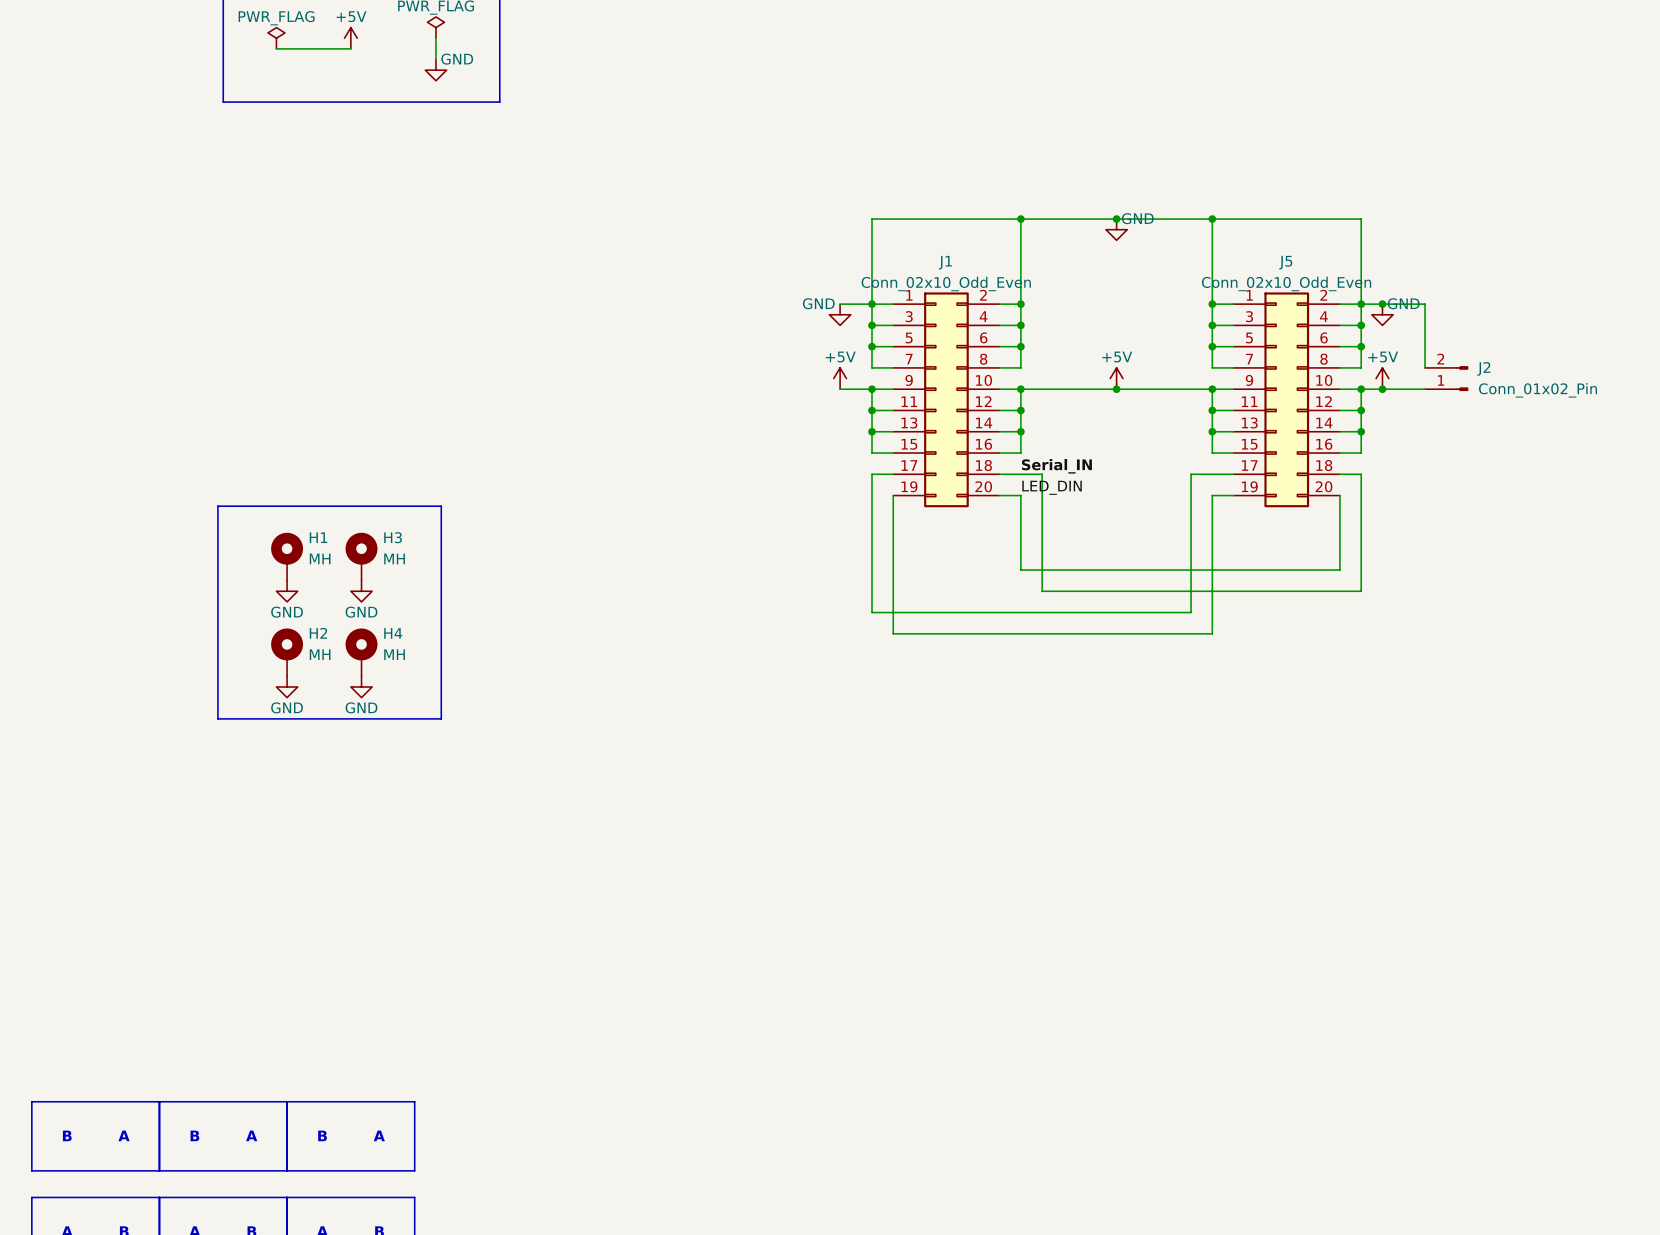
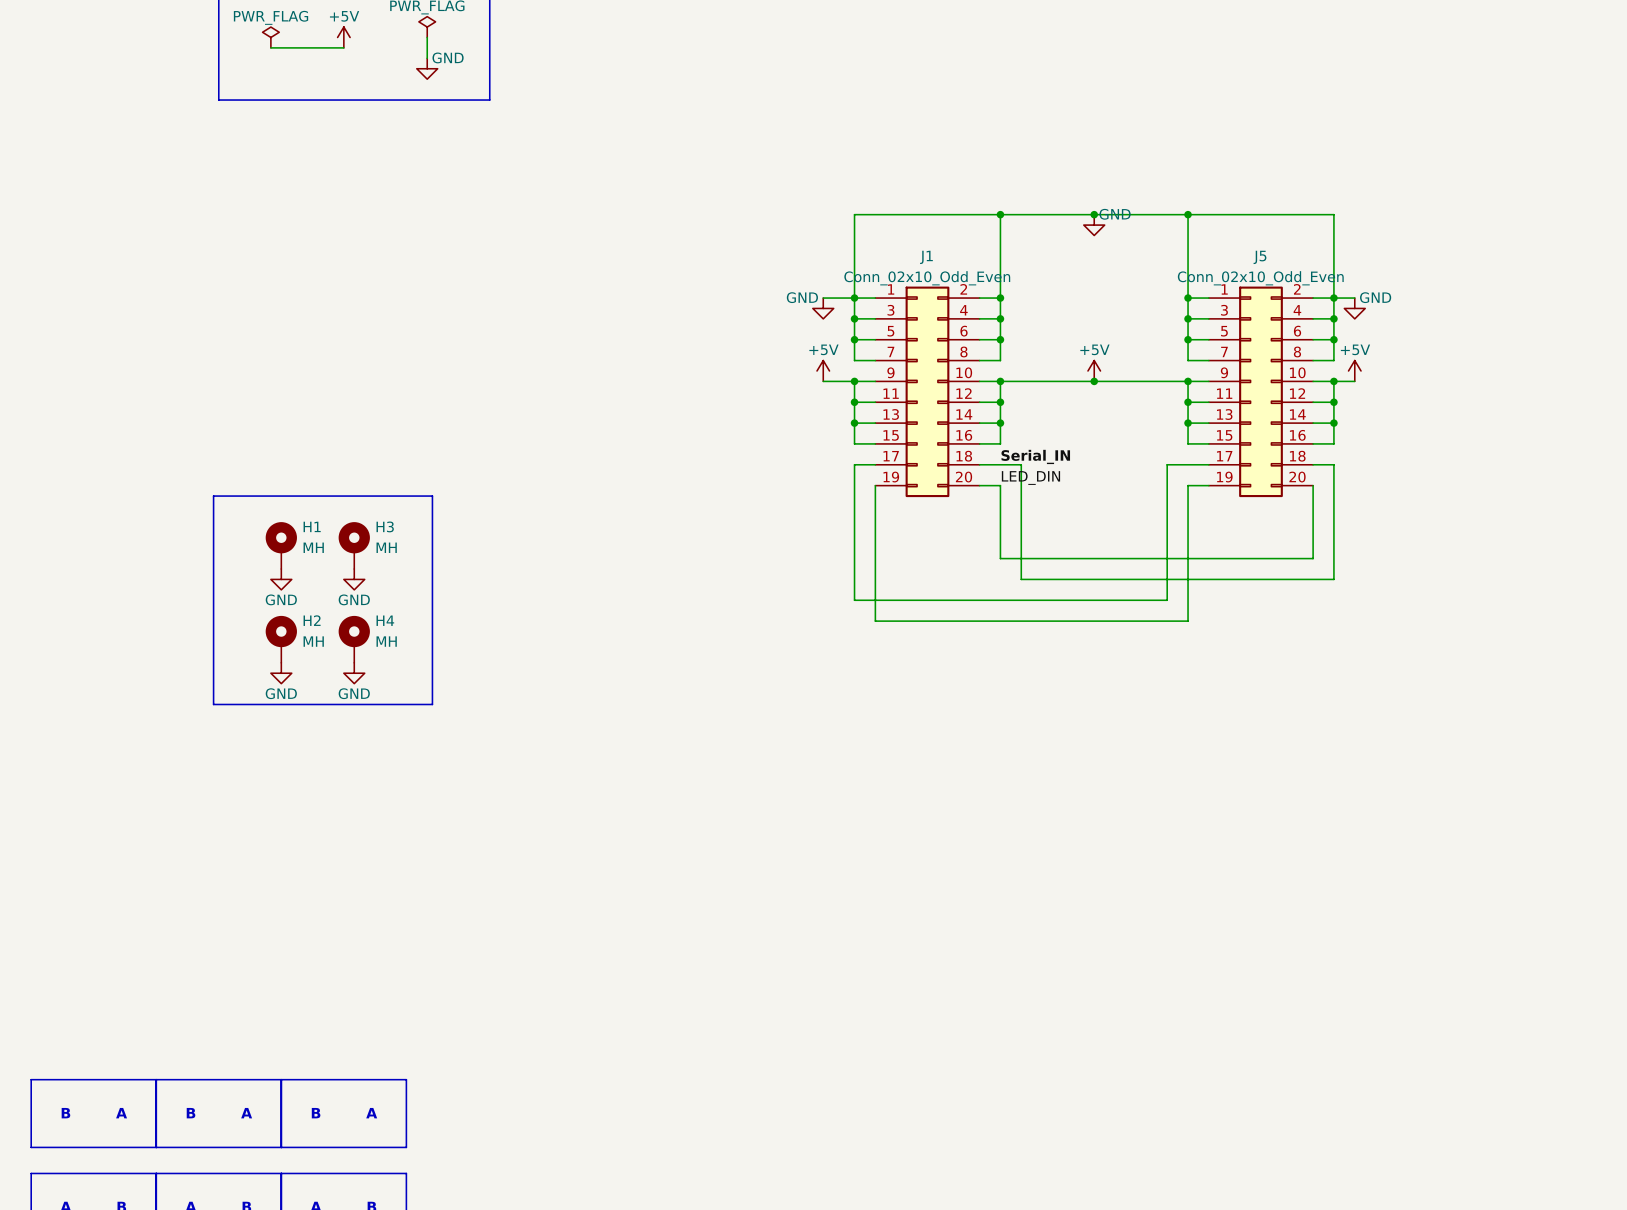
wire: (1382, 304) (1425, 304) (1425, 367) -> none
junction: (1382, 304) -> none
J2: Conn_01x02_Pin (1446, 378) -> none
wire: (1382, 389) (1425, 389) -> none
junction: (1382, 389) -> none

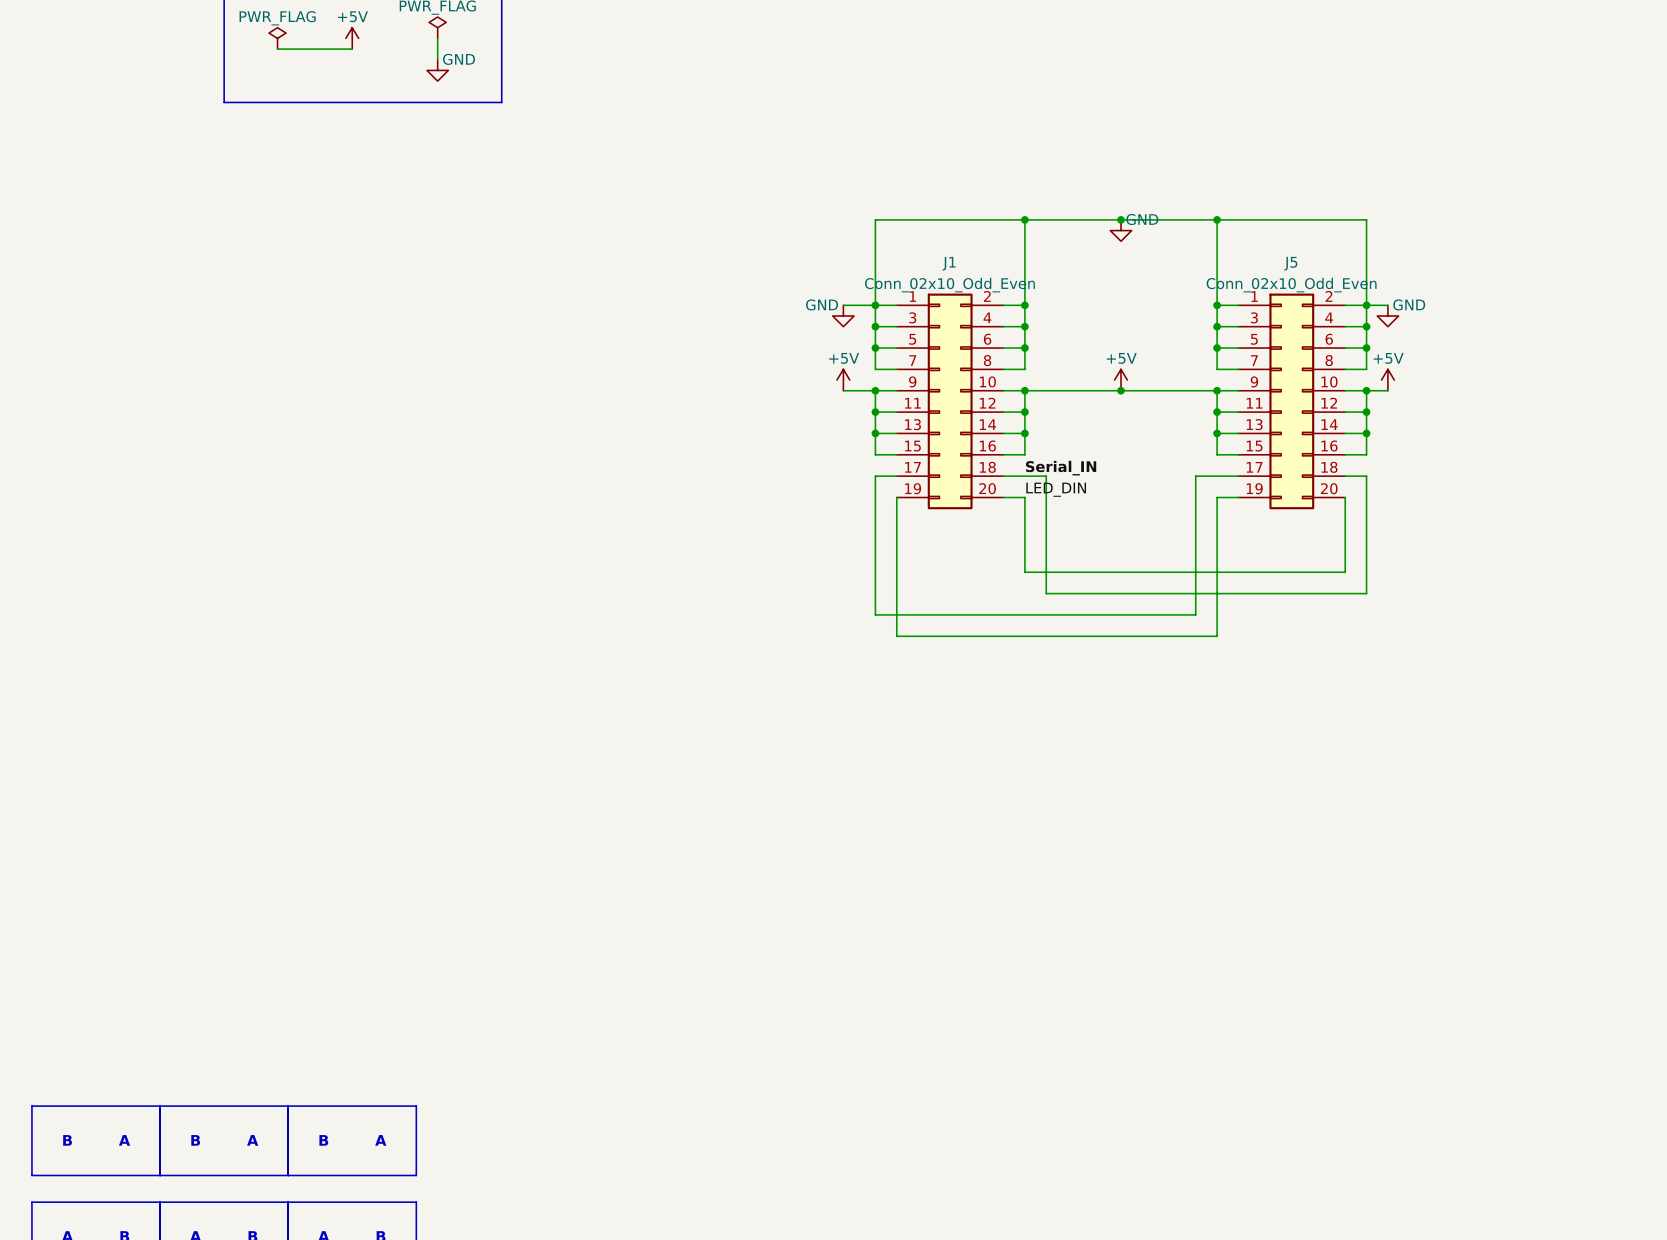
line: (213, 496) (432, 496) (432, 704) (213, 704) (213, 496) -> none
H1: MH (281, 545) -> none
H3: MH (354, 545) -> none
power symbol: GND (281, 579) -> none
power symbol: GND (354, 579) -> none
H2: MH (281, 639) -> none
H4: MH (354, 639) -> none
power symbol: GND (281, 673) -> none
power symbol: GND (354, 673) -> none

